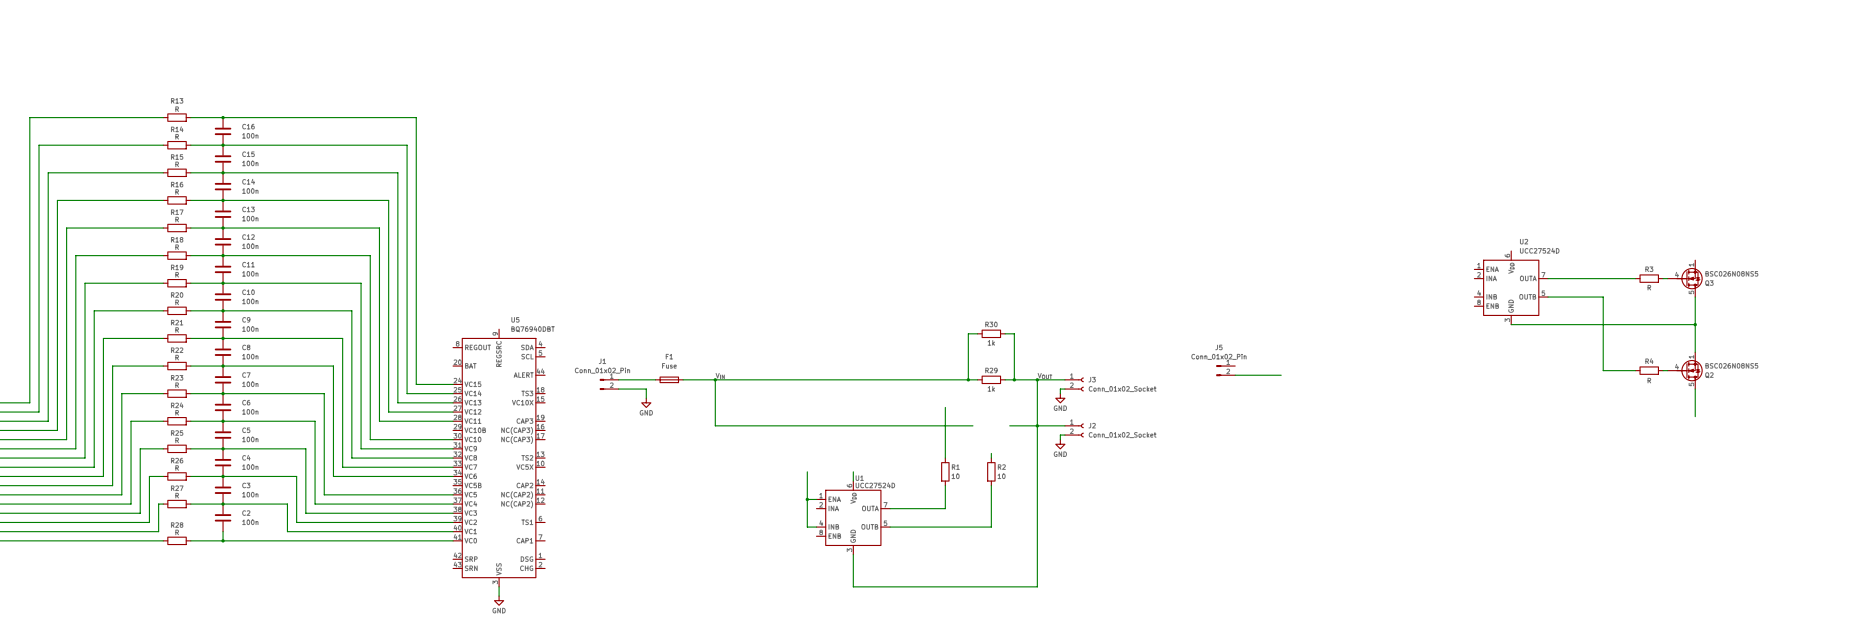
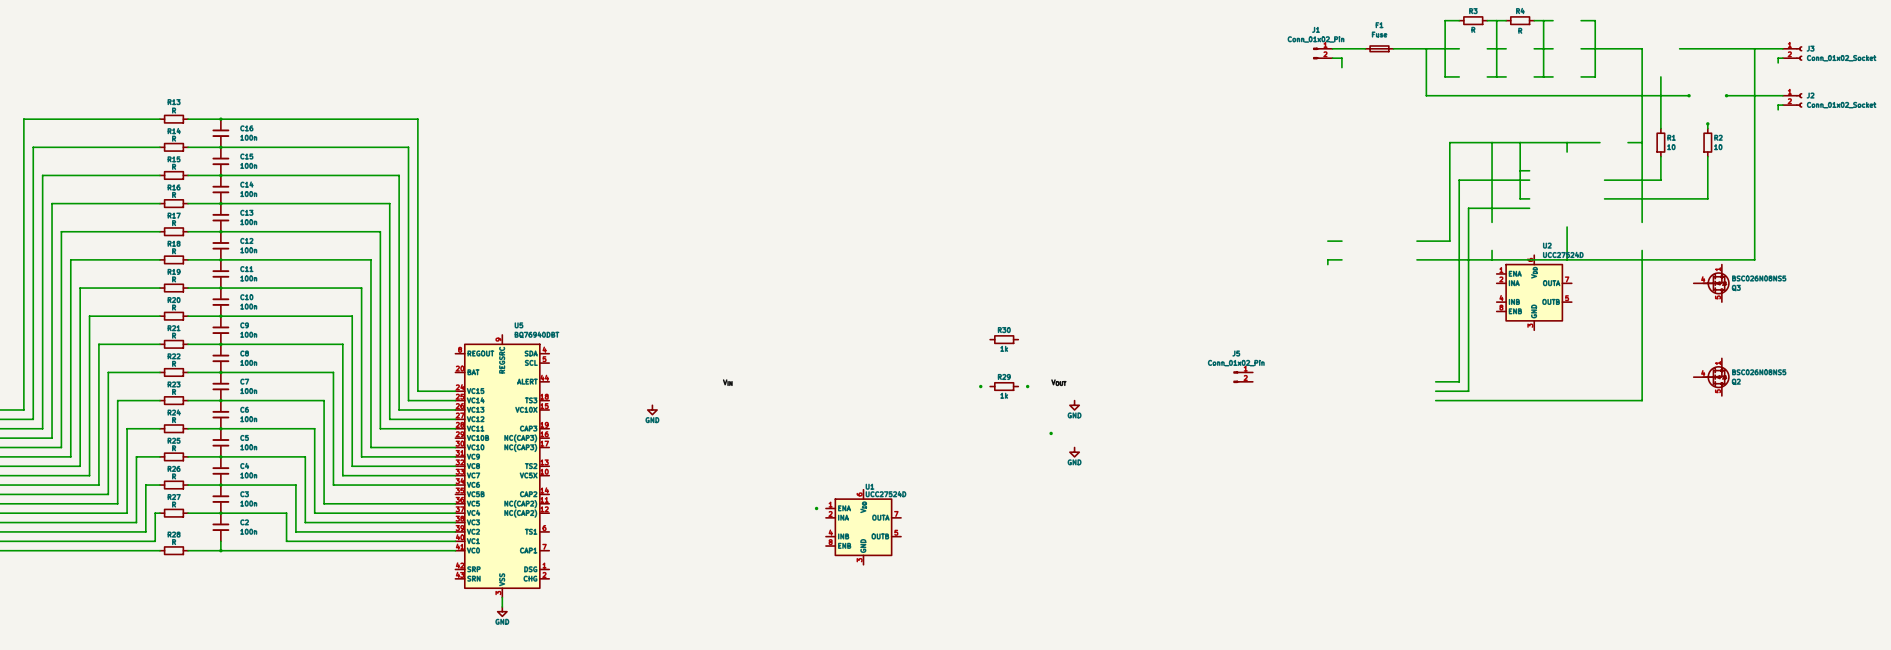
wire: none -> (1459, 20) (1445, 20) (1445, 76) (1459, 76)
wire: none -> (1487, 20) (1506, 20)
wire: none -> (1496, 20) (1496, 76)
wire: none -> (1534, 20) (1553, 20)
wire: none -> (1543, 20) (1543, 76)
wire: none -> (1581, 20) (1595, 20) (1595, 76) (1581, 76)
wire: none -> (1332, 48) (1365, 48)
wire: none -> (1393, 48) (1459, 48)
wire: none -> (1426, 48) (1426, 95) (1689, 95)
wire: none -> (1487, 48) (1506, 48)
wire: none -> (1534, 48) (1553, 48)
wire: none -> (1581, 48) (1642, 48) (1642, 222)
wire: none -> (1679, 48) (1782, 48)
wire: none -> (1754, 48) (1754, 259) (1416, 259)
wire: none -> (1332, 58) (1341, 58) (1341, 67)
wire: none -> (1782, 58) (1778, 58) (1778, 62)
wire: none -> (1487, 76) (1506, 76)
wire: none -> (1534, 76) (1553, 76)
wire: none -> (1660, 76) (1660, 128)
junction: none -> (1689, 95)
wire: none -> (1726, 95) (1782, 95)
junction: none -> (1726, 95)
wire: none -> (1782, 105) (1778, 105) (1778, 109)
wire: none -> (1707, 123) (1707, 128)
junction: none -> (1707, 123)
wire: none -> (1492, 142) (1492, 222)
wire: none -> (1520, 142) (1520, 198) (1529, 198)
wire: none -> (1567, 142) (1567, 152)
wire: none -> (1599, 142) (1449, 142) (1449, 241) (1416, 241)
wire: none -> (1628, 142) (1642, 142)
wire: none -> (1660, 156) (1660, 180) (1604, 180)
wire: none -> (1707, 156) (1707, 198) (1604, 198)
wire: none -> (1520, 170) (1529, 170)
wire: none -> (1529, 180) (1459, 180) (1459, 381) (1435, 381)
wire: none -> (1529, 208) (1468, 208) (1468, 391) (1435, 391)
wire: none -> (1567, 227) (1567, 259)
wire: none -> (1327, 241) (1341, 241)
wire: none -> (1492, 250) (1492, 259)
wire: none -> (1642, 250) (1642, 400) (1435, 400)
wire: none -> (1341, 259) (1327, 259) (1327, 264)
wire: (1548, 278) (1635, 278) -> none
part position: (1649, 278) -> (1473, 20)
wire: (1663, 278) (1667, 278) -> none
wire: (1548, 297) (1603, 297) (1603, 370) (1635, 370) -> none
wire: (1695, 297) (1695, 352) -> none
wire: (1511, 324) (1695, 324) -> none
junction: (1695, 324) -> none
wire: (977, 333) (968, 333) (968, 379) -> none
wire: (1005, 333) (1014, 333) (1014, 379) -> none
part position: (1649, 370) -> (1520, 20)
wire: (1663, 370) (1667, 370) -> none
wire: (1235, 375) (1281, 375) -> none
wire: (618, 379) (655, 379) -> none
part position: (669, 379) -> (1379, 48)
wire: (683, 379) (977, 379) -> none
wire: (715, 379) (715, 425) (972, 425) -> none
junction: (715, 379) -> none
wire: (1005, 379) (1064, 379) -> none
wire: (1037, 379) (1037, 586) (853, 586) (853, 554) -> none
junction: (1037, 379) -> none
part position: (609, 384) -> (1323, 53)
part position: (1074, 384) -> (1792, 53)
wire: (618, 389) (646, 389) (646, 398) -> none
wire: (1064, 389) (1060, 389) (1060, 393) -> none
wire: (1695, 389) (1695, 416) -> none
wire: (945, 407) (945, 458) -> none
wire: (1009, 425) (1064, 425) -> none
part position: (1074, 430) -> (1792, 100)
wire: (1064, 435) (1060, 435) (1060, 439) -> none
wire: (991, 453) (991, 458) -> none
wire: (807, 471) (807, 527) (816, 527) -> none
wire: (853, 471) (853, 481) -> none
part position: (945, 471) -> (1660, 142)
part position: (991, 471) -> (1707, 142)
wire: (945, 485) (945, 508) (890, 508) -> none
wire: (991, 485) (991, 527) (890, 527) -> none
wire: (807, 499) (816, 499) -> none

